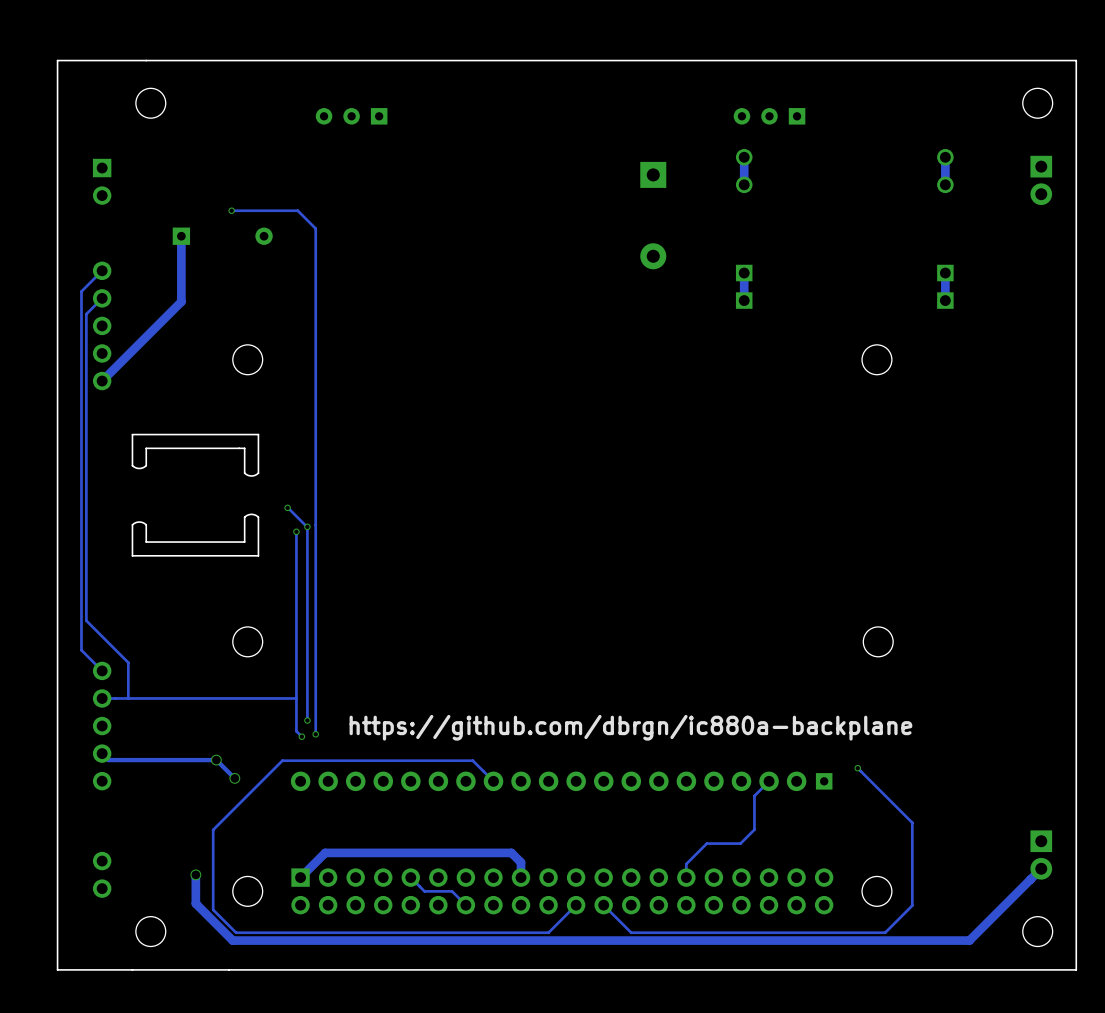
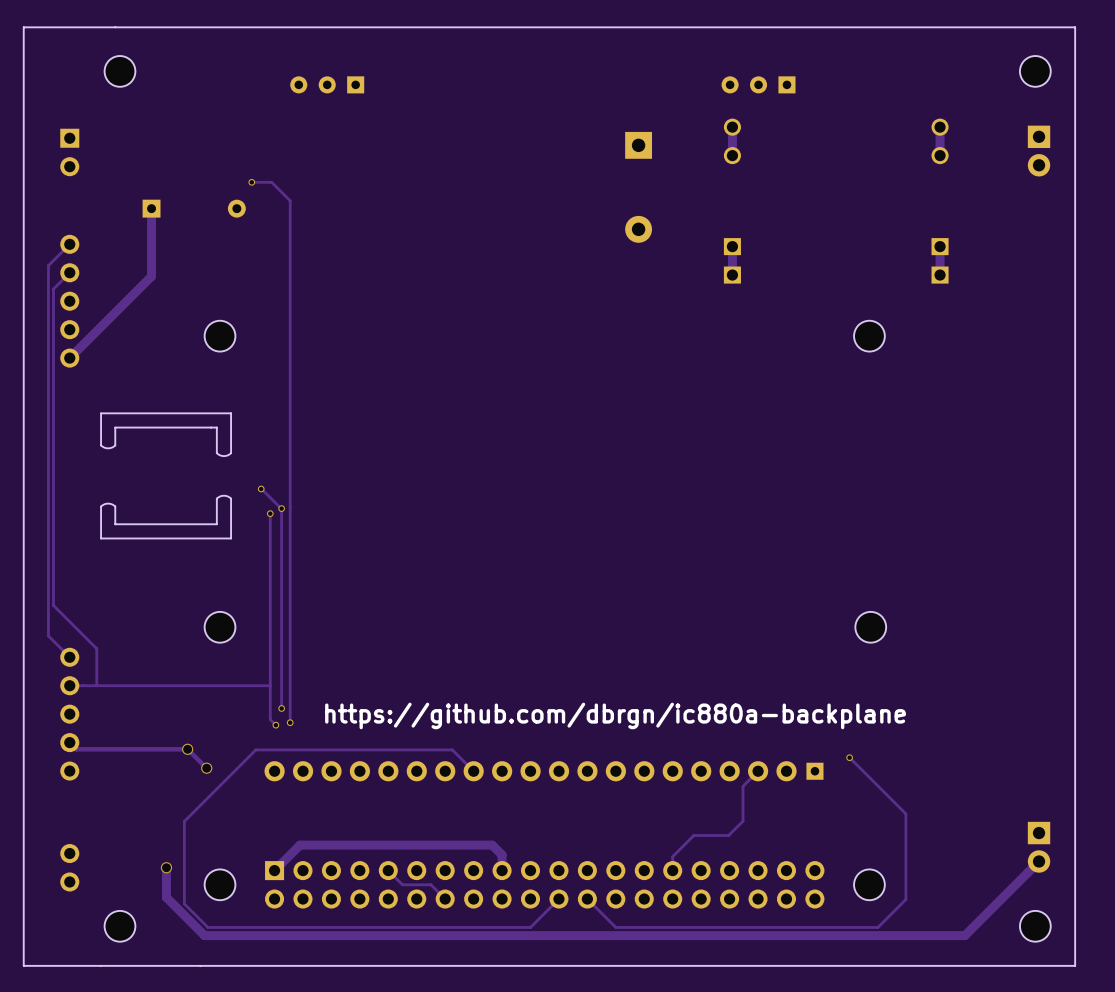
via position: (231, 210) -> (251, 182)
track: (278, 210) (231, 210) -> none

